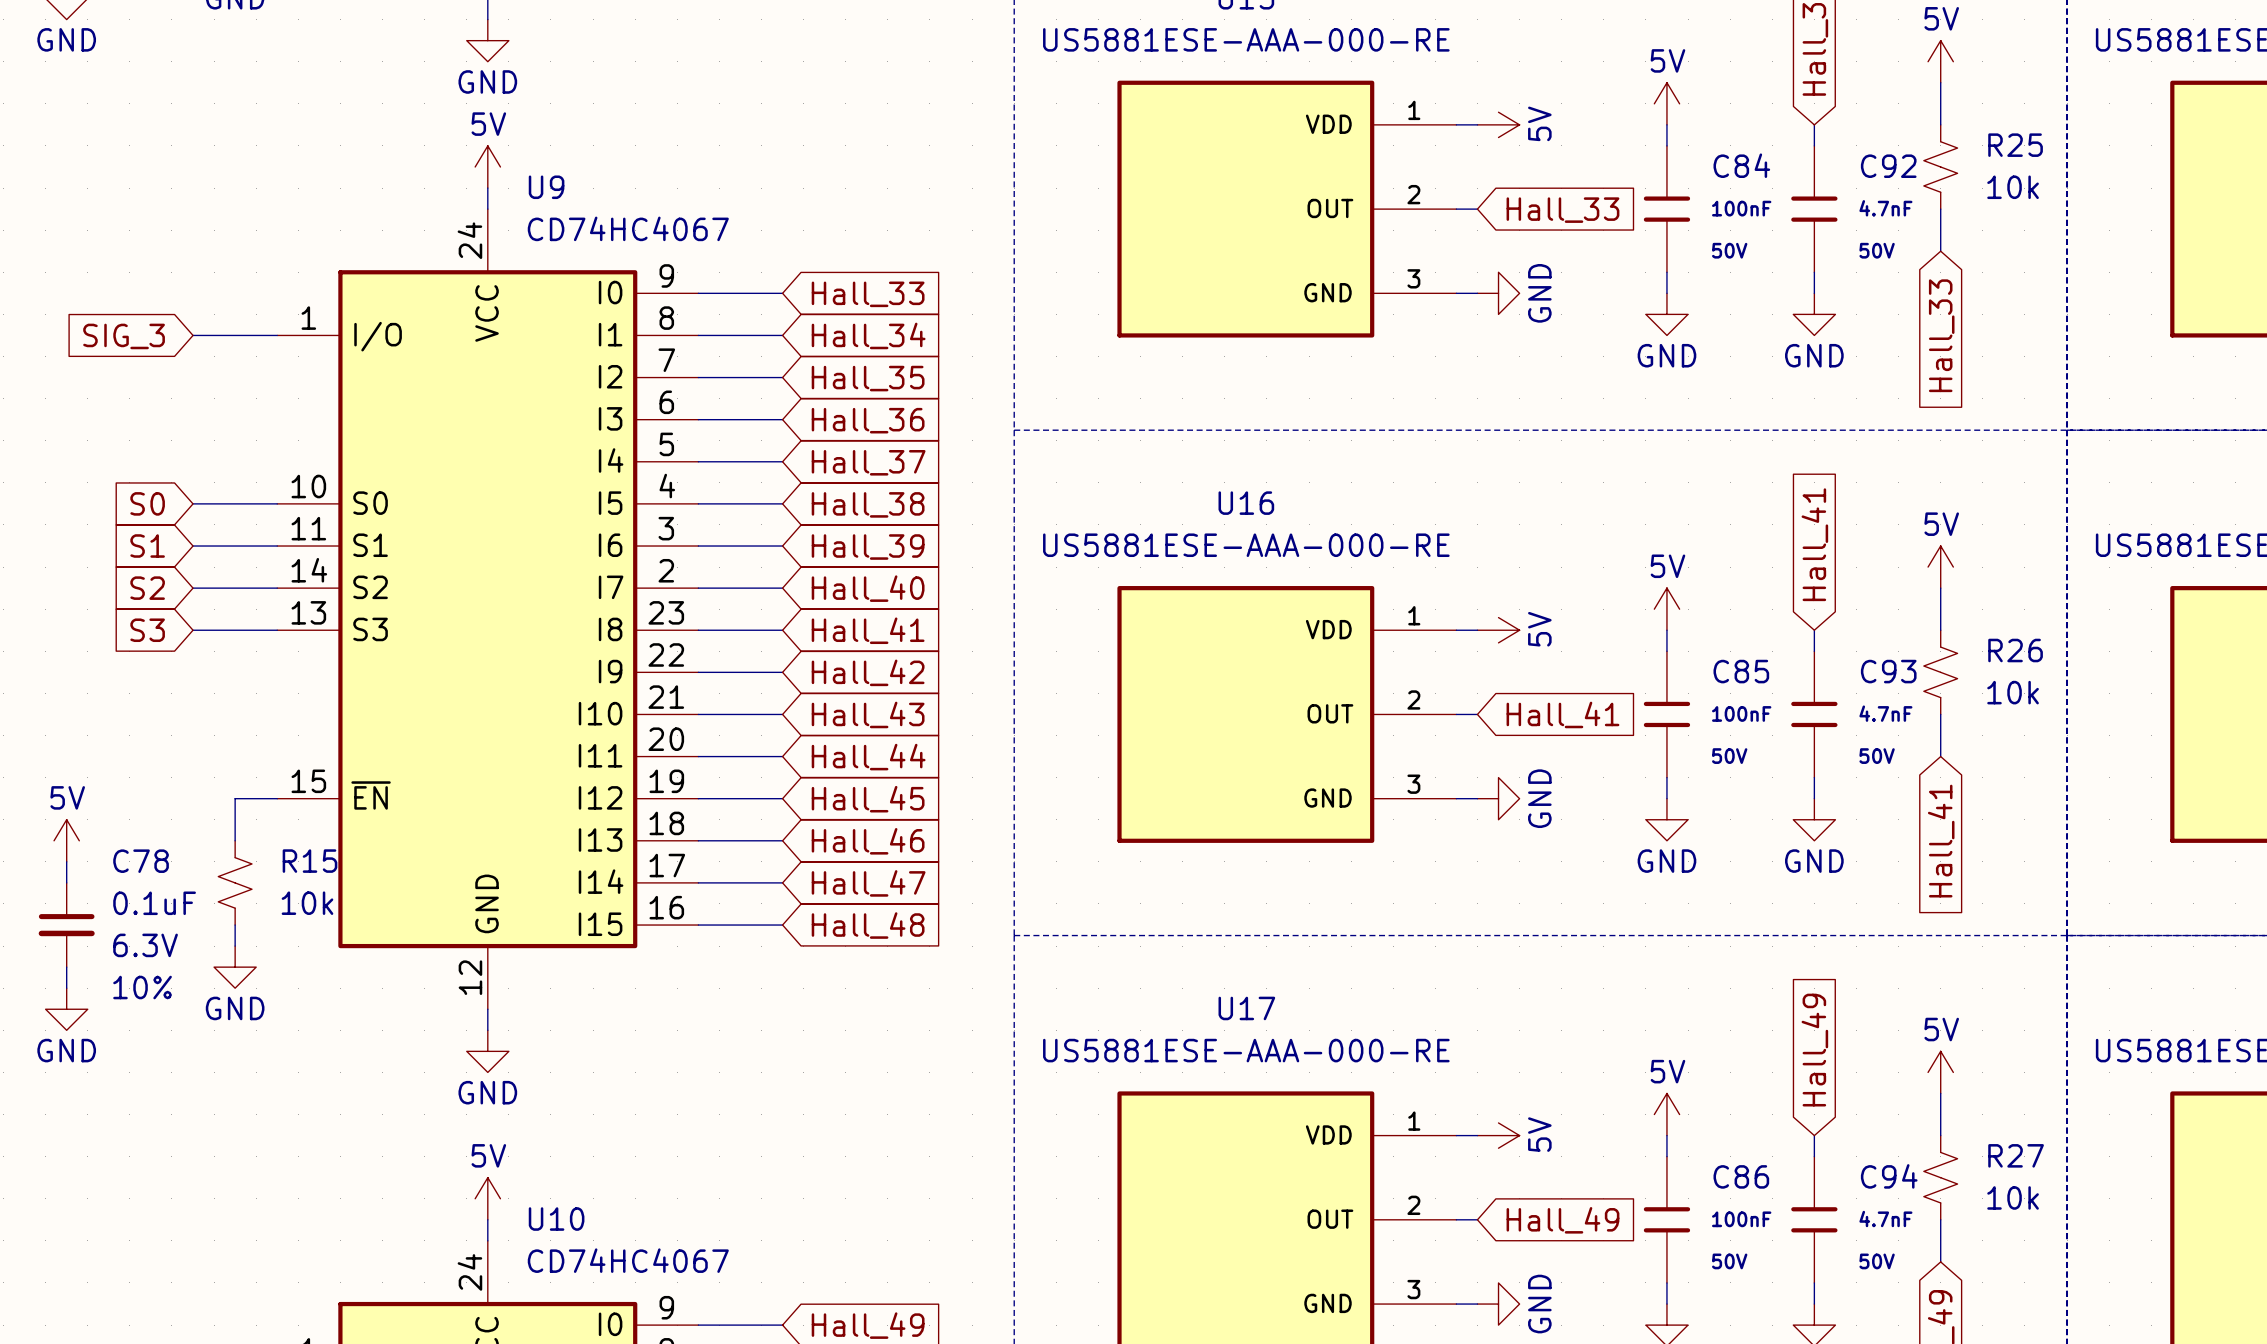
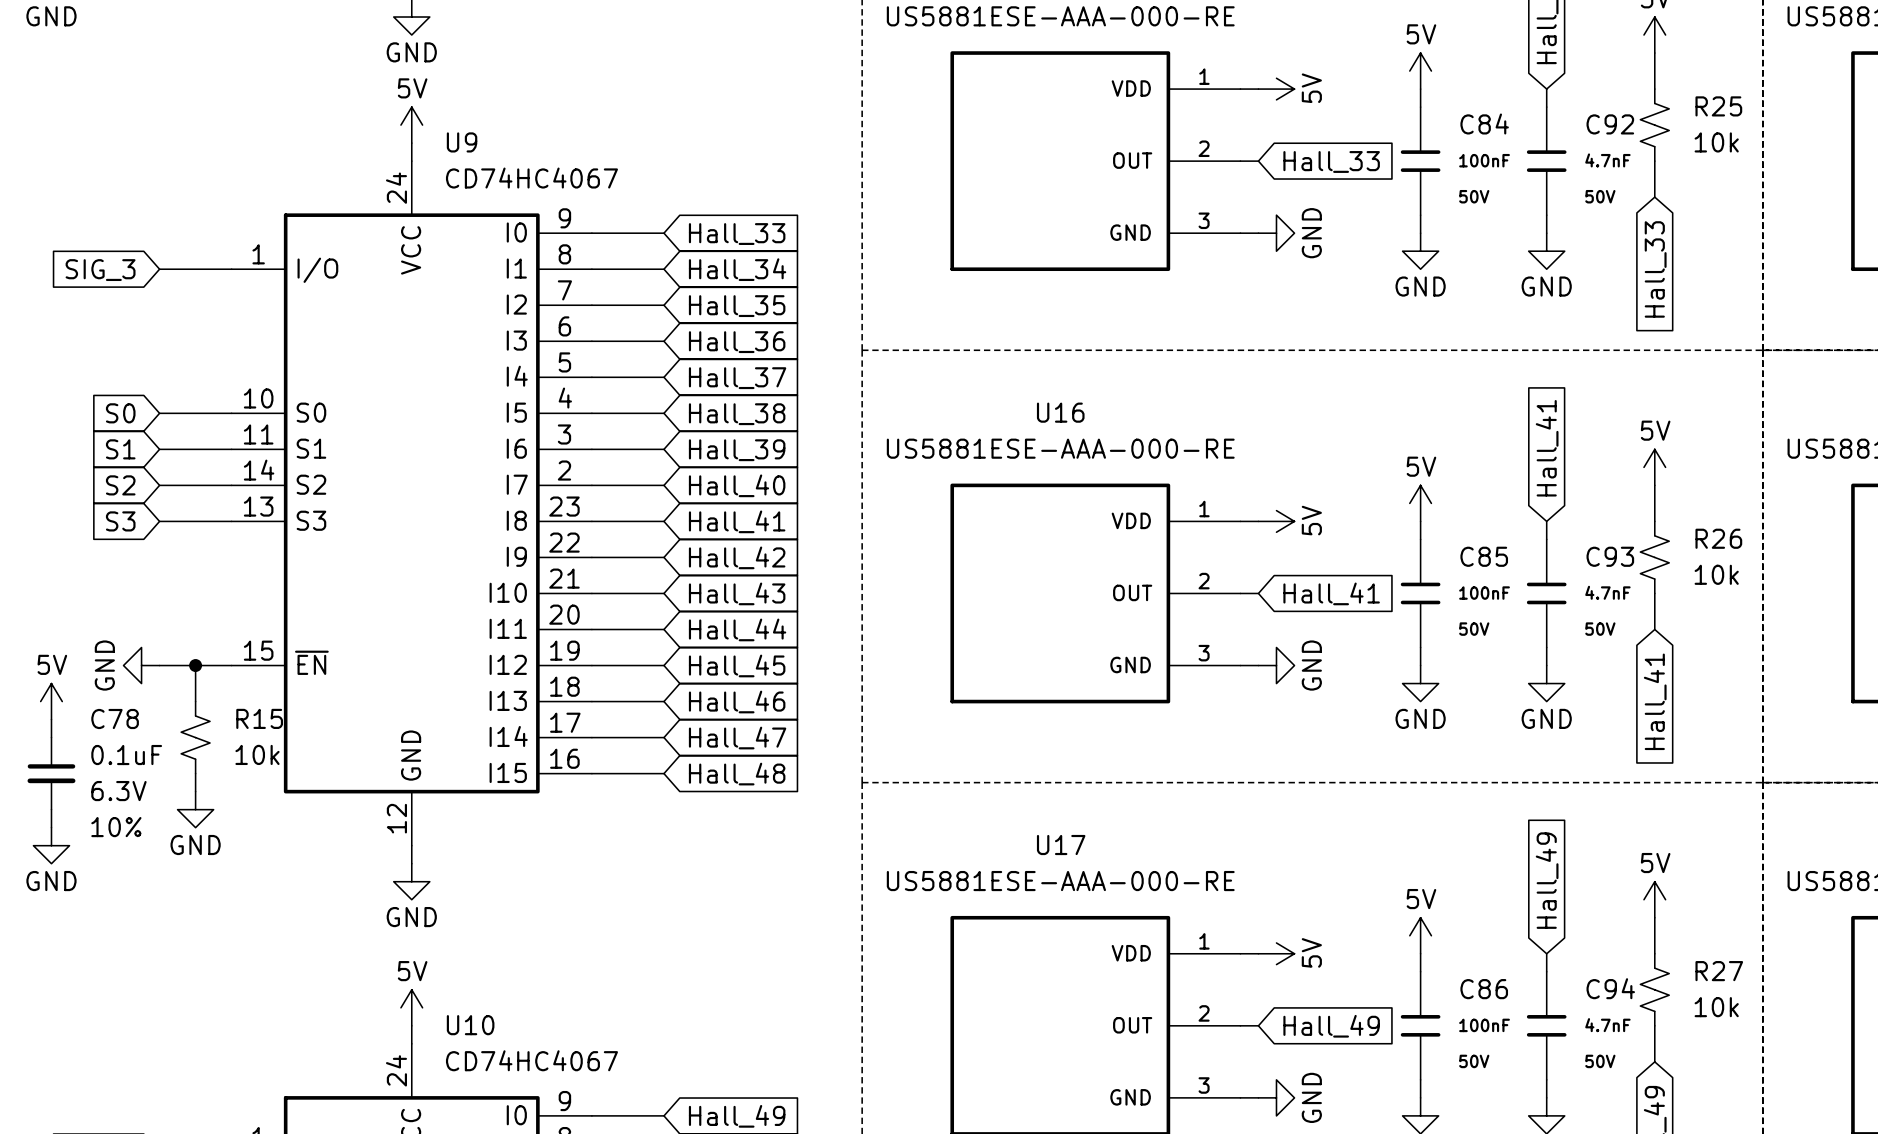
power symbol: none -> GND (141, 665)
wire: none -> (159, 665) (195, 665)
junction: none -> (195, 665)

